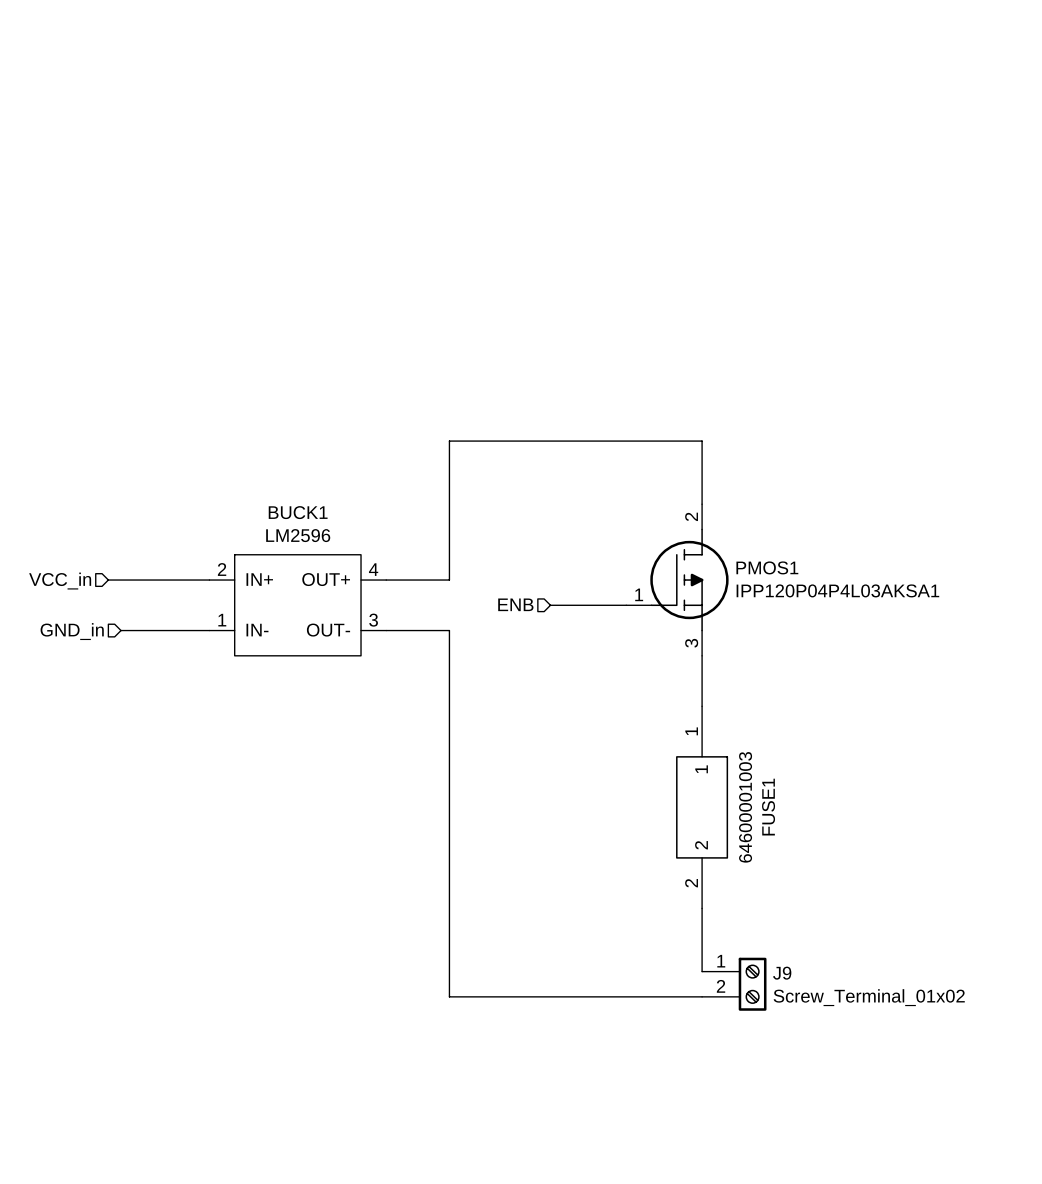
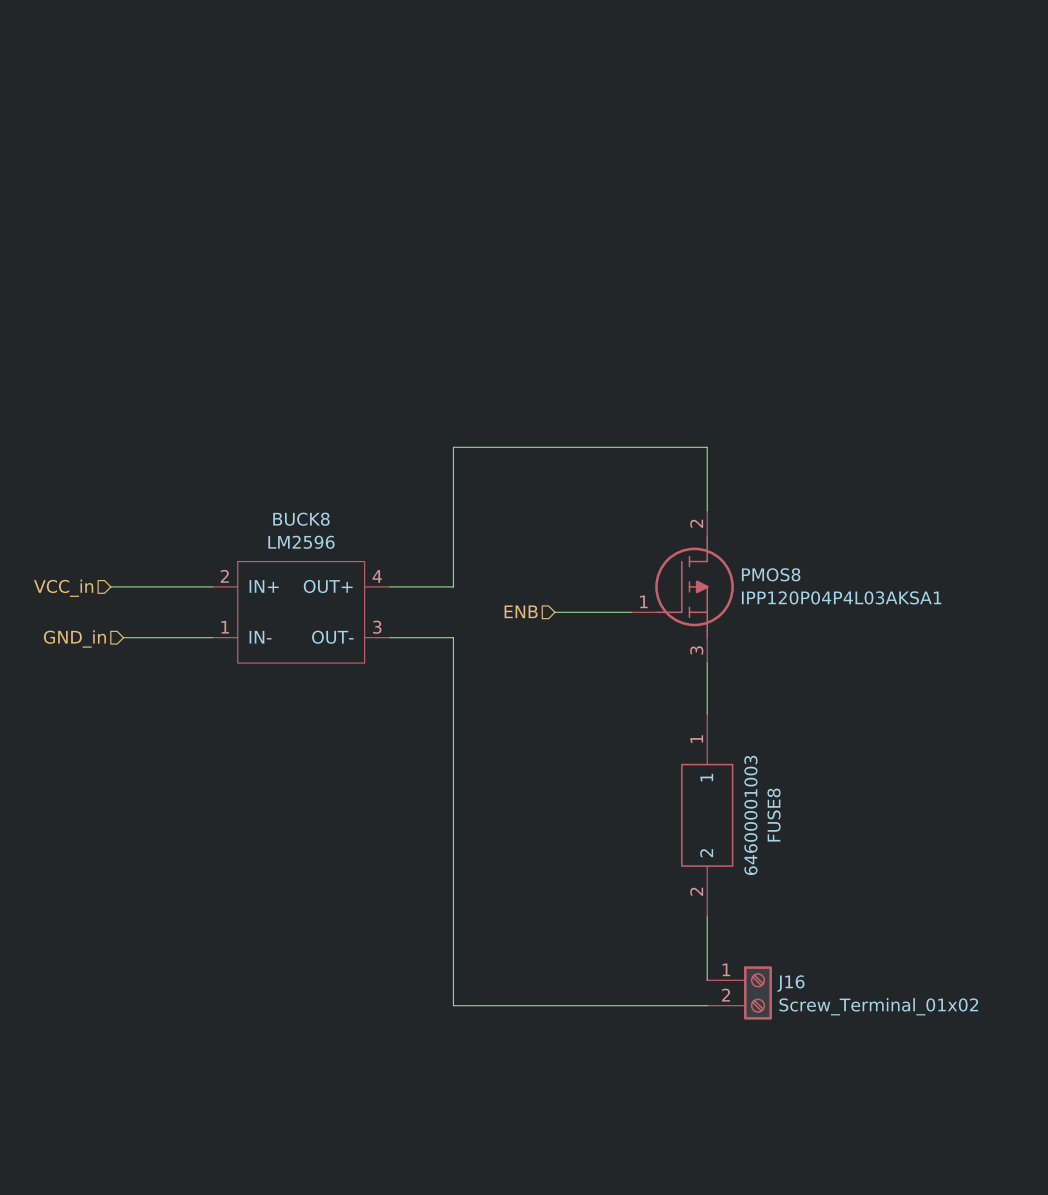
BUCK1 name: BUCK1 (298, 512) -> BUCK8 (301, 519)
PMOS1 name: PMOS1 (767, 567) -> PMOS8 (771, 574)
FUSE1 name: FUSE1 (768, 807) -> FUSE8 (774, 815)
J9 name: J9 (782, 973) -> J16 (790, 983)

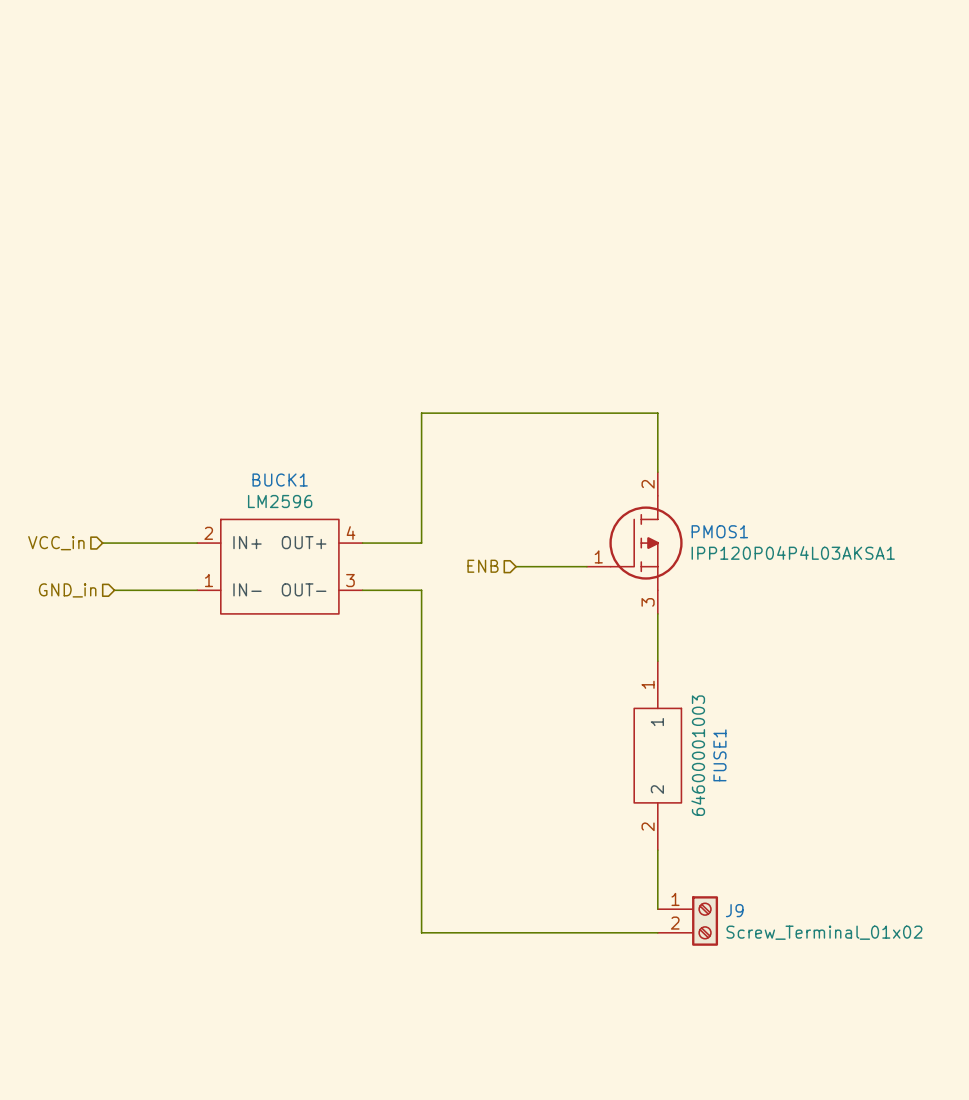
BUCK8 name: BUCK8 (301, 519) -> BUCK1 (280, 480)
PMOS8 name: PMOS8 (771, 574) -> PMOS1 (719, 531)
FUSE8 name: FUSE8 (774, 815) -> FUSE1 (719, 755)
J16 name: J16 (790, 983) -> J9 (734, 910)

